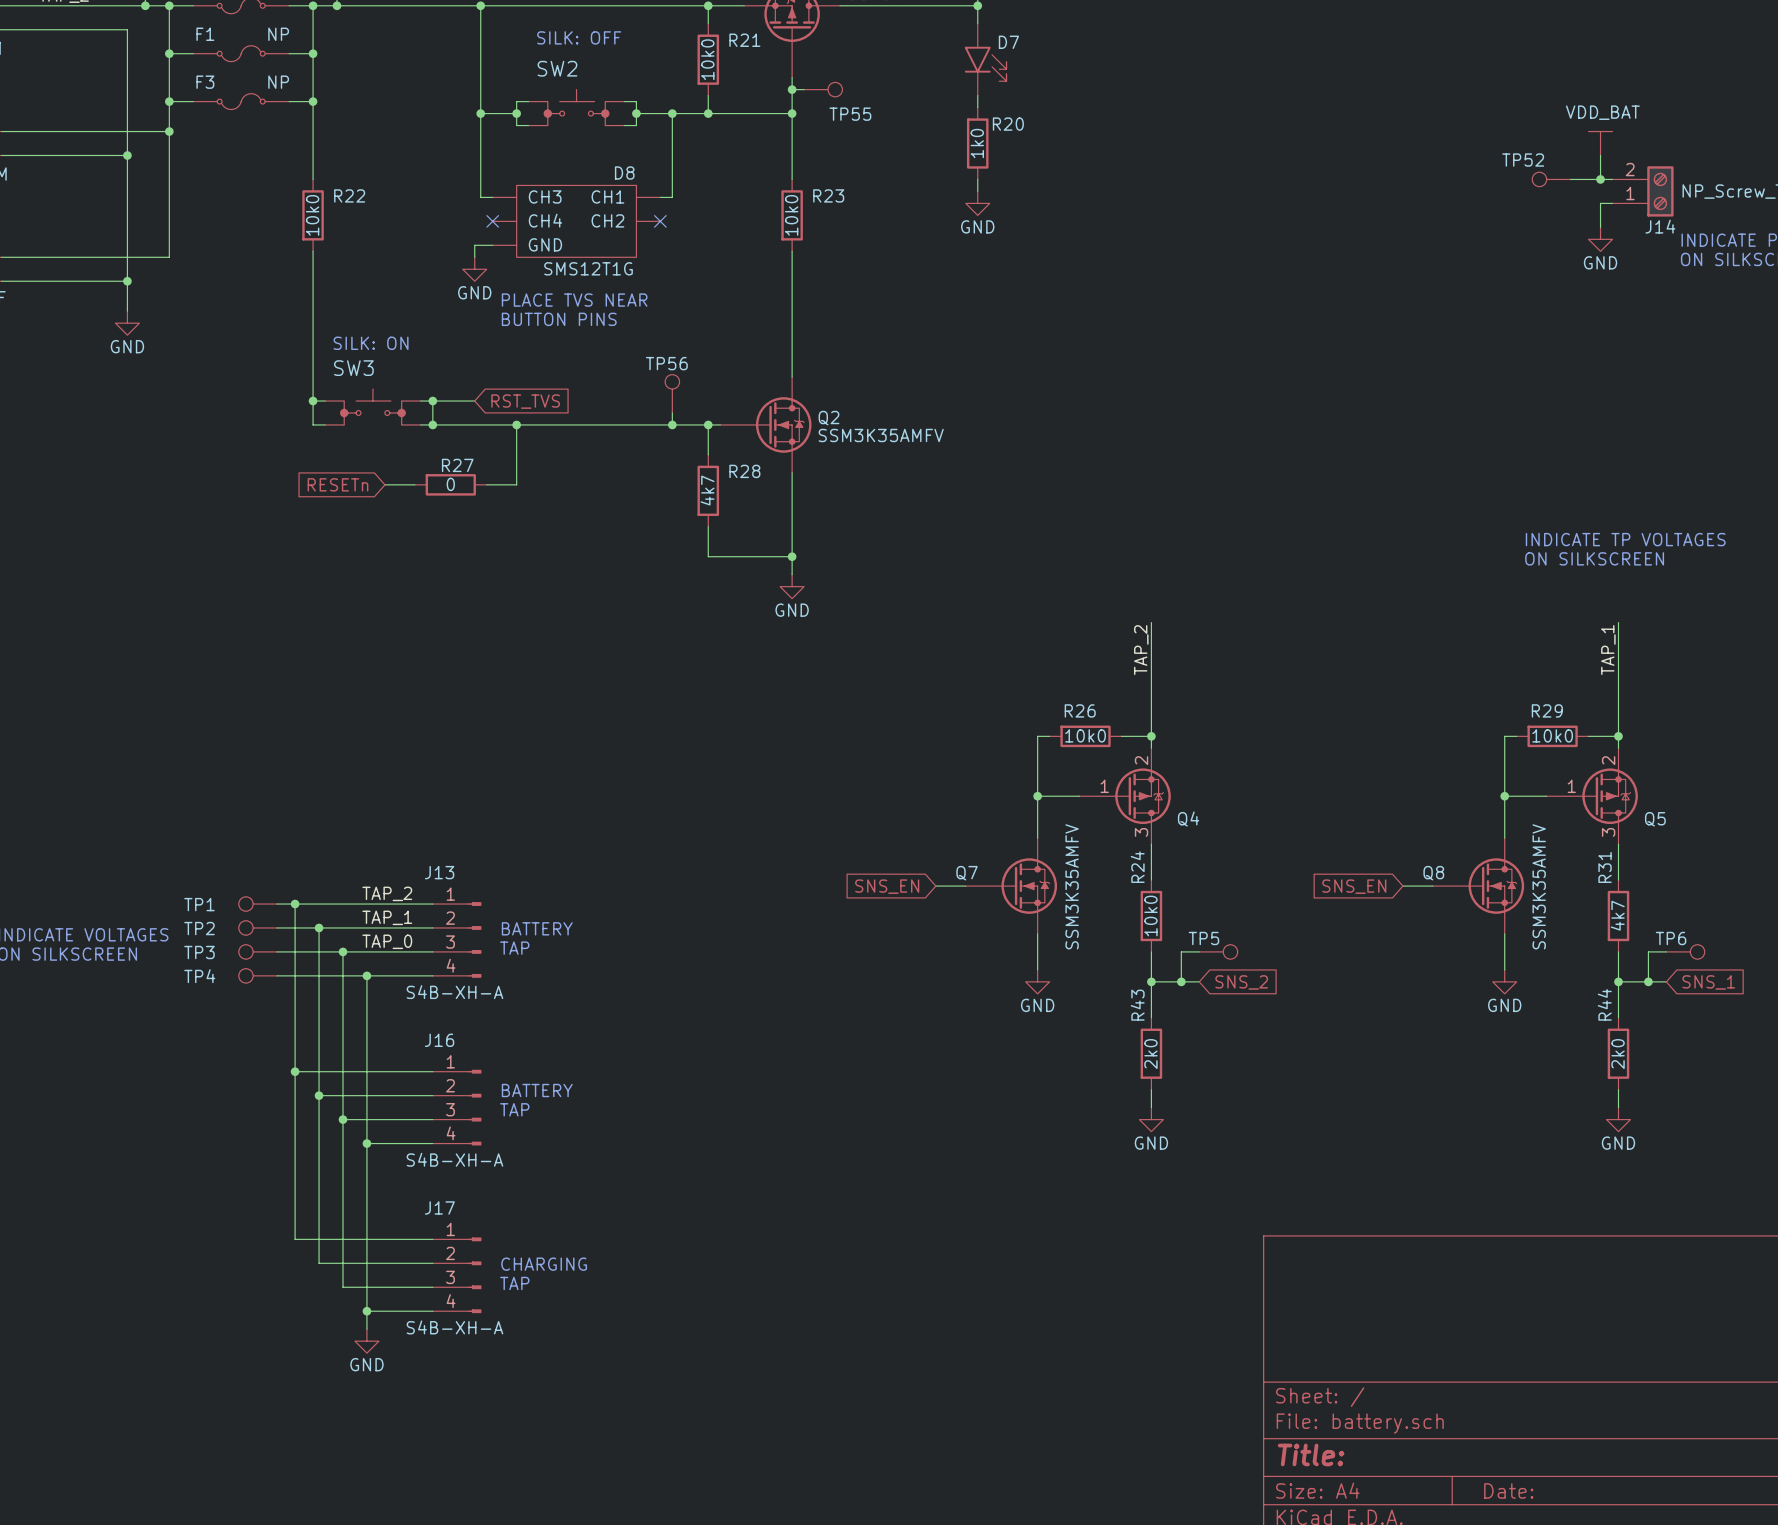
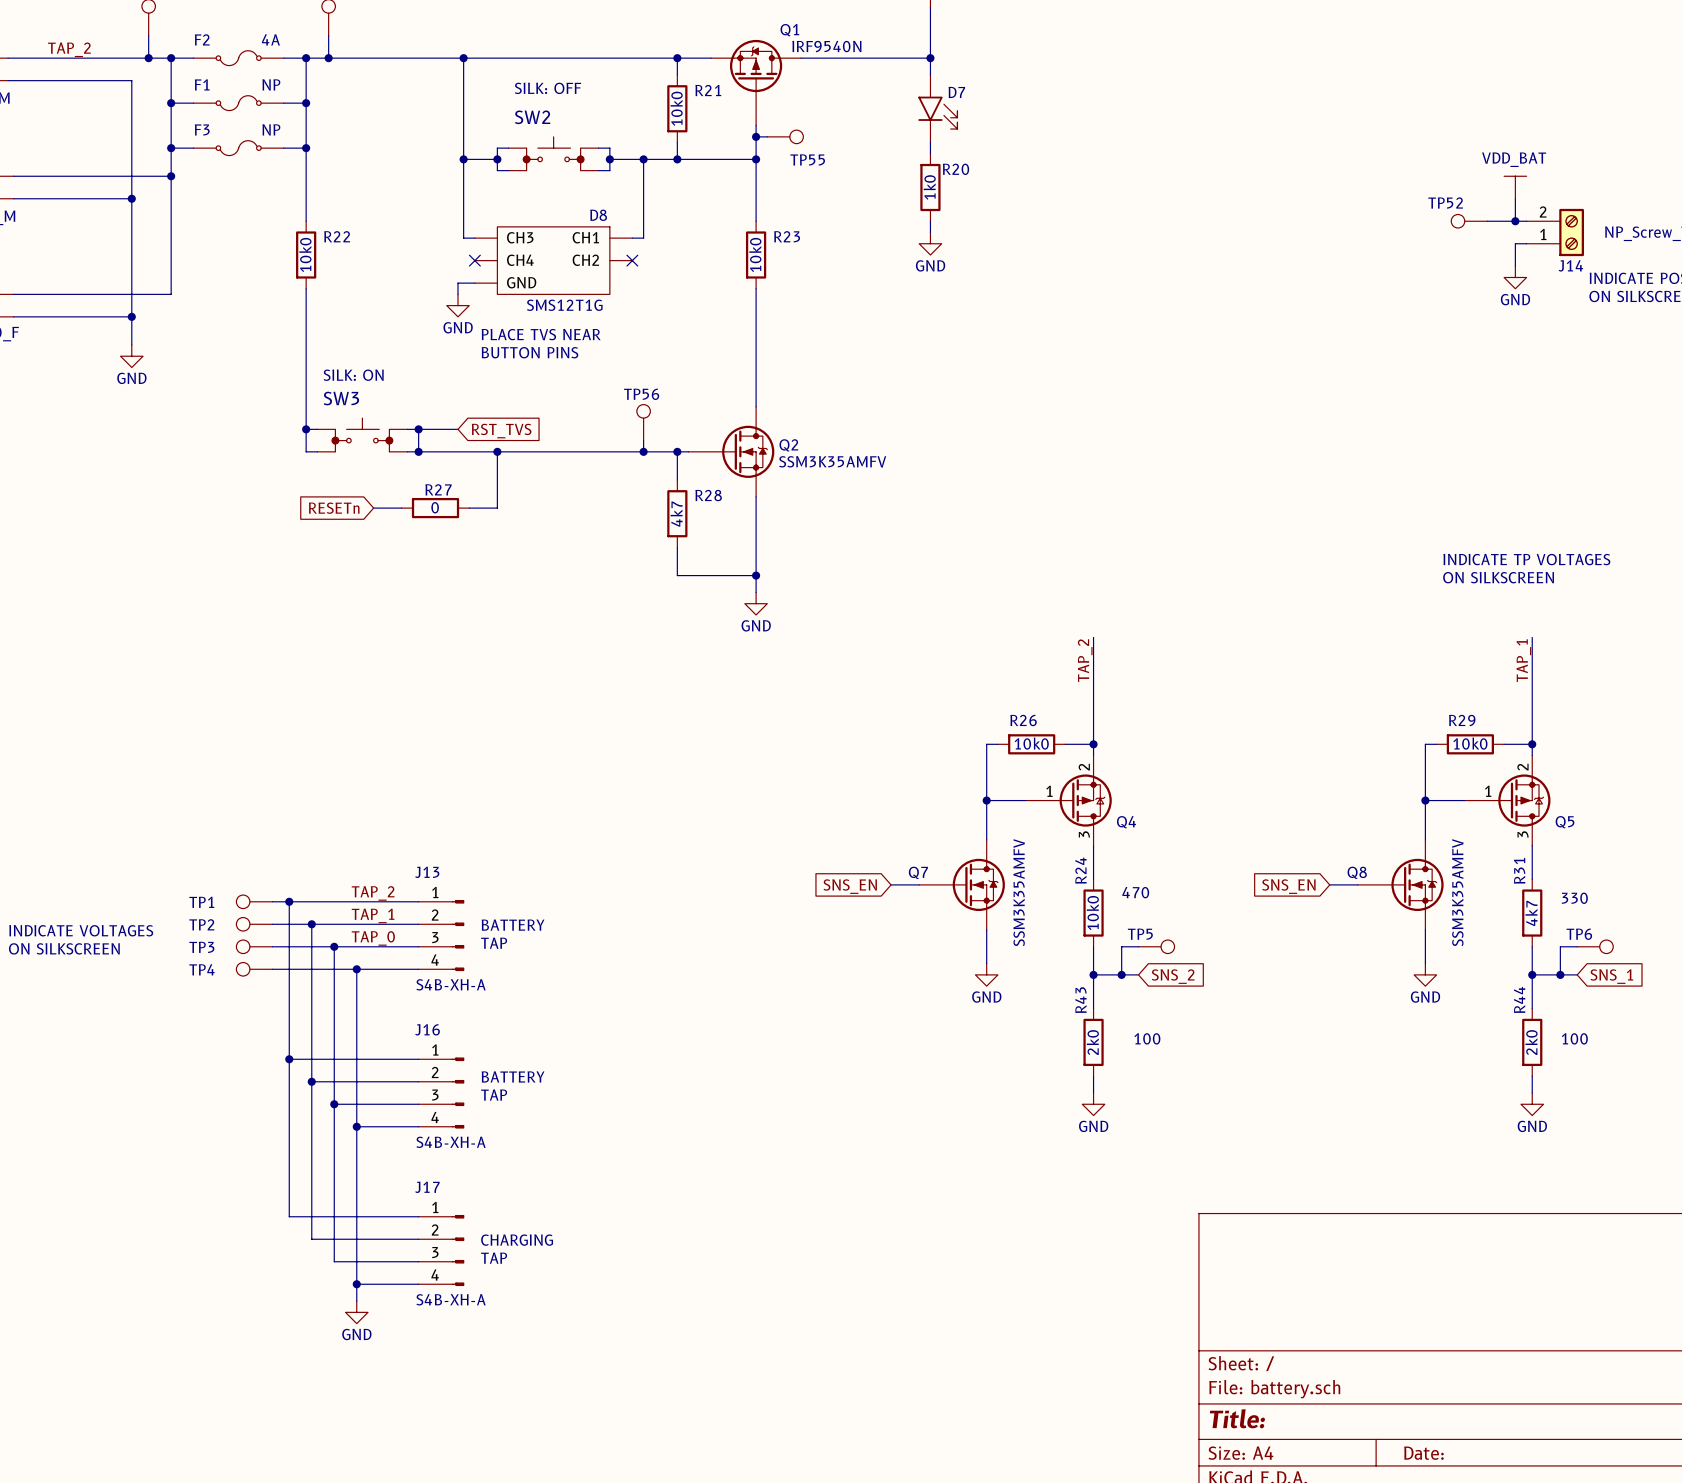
text: none -> 470 (1135, 892)
text: none -> 330 (1574, 898)
text: none -> 100 (1147, 1038)
text: none -> 100 (1574, 1038)

